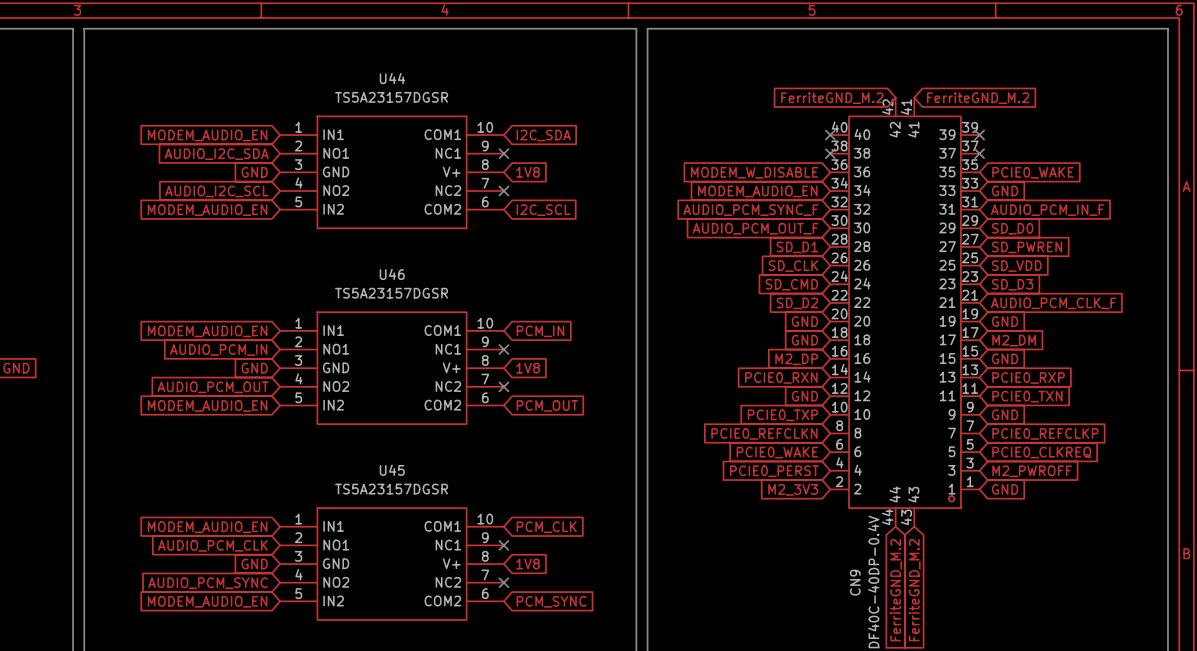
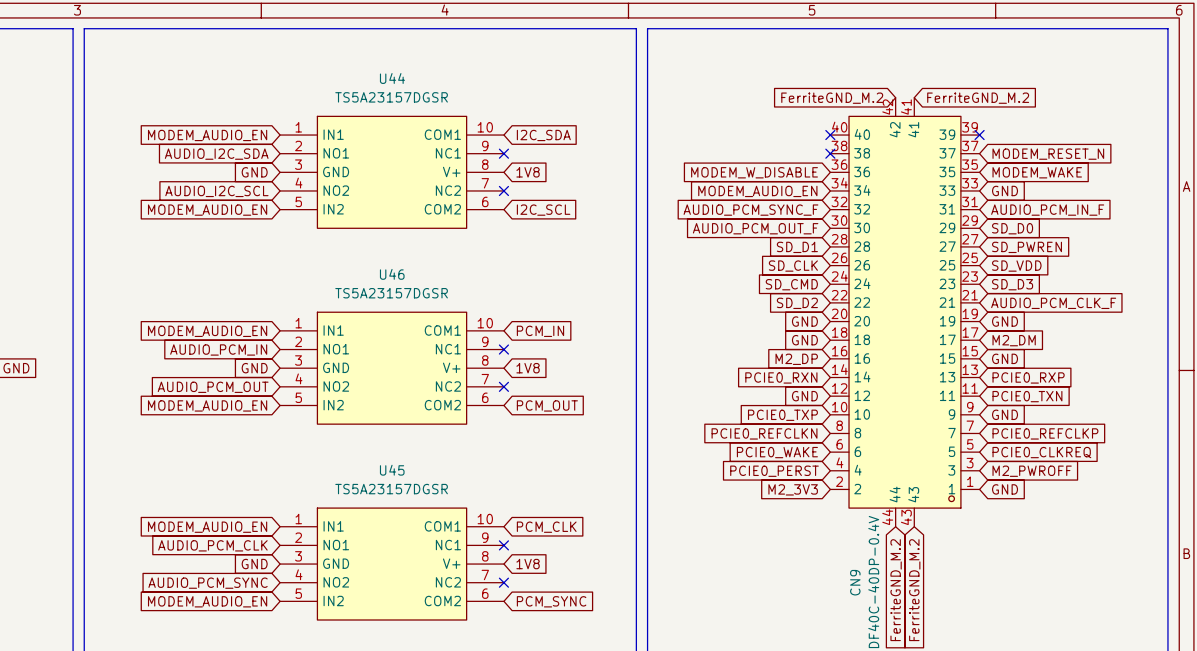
no-connect mark: (979, 153) -> none
global label: none -> MODEM_RESET_N (1048, 154)
global label: PCIE0_WAKE (1033, 172) -> MODEM_WAKE (1037, 172)

